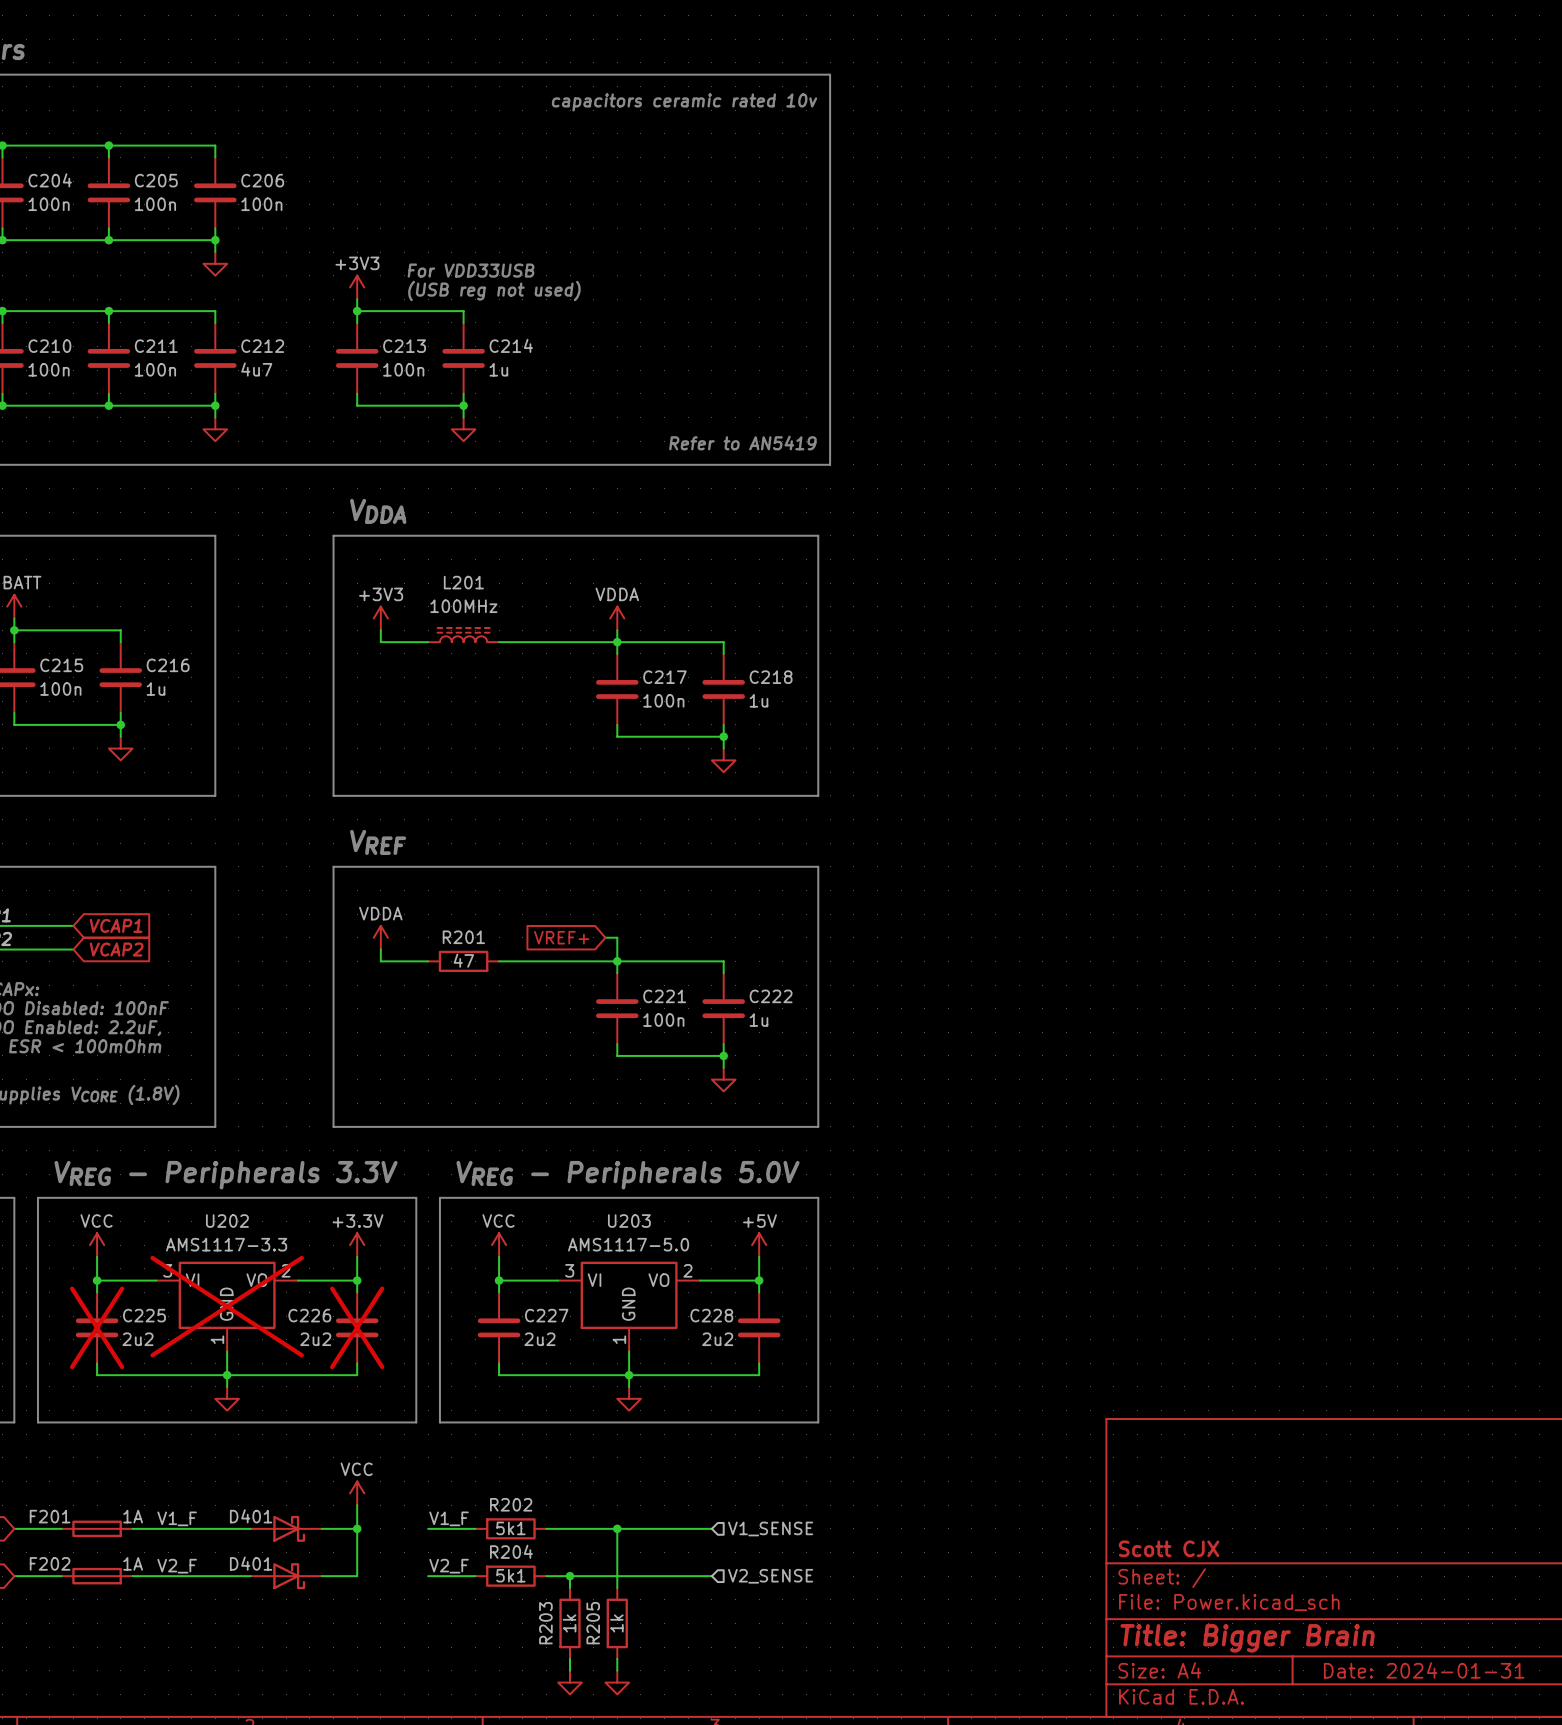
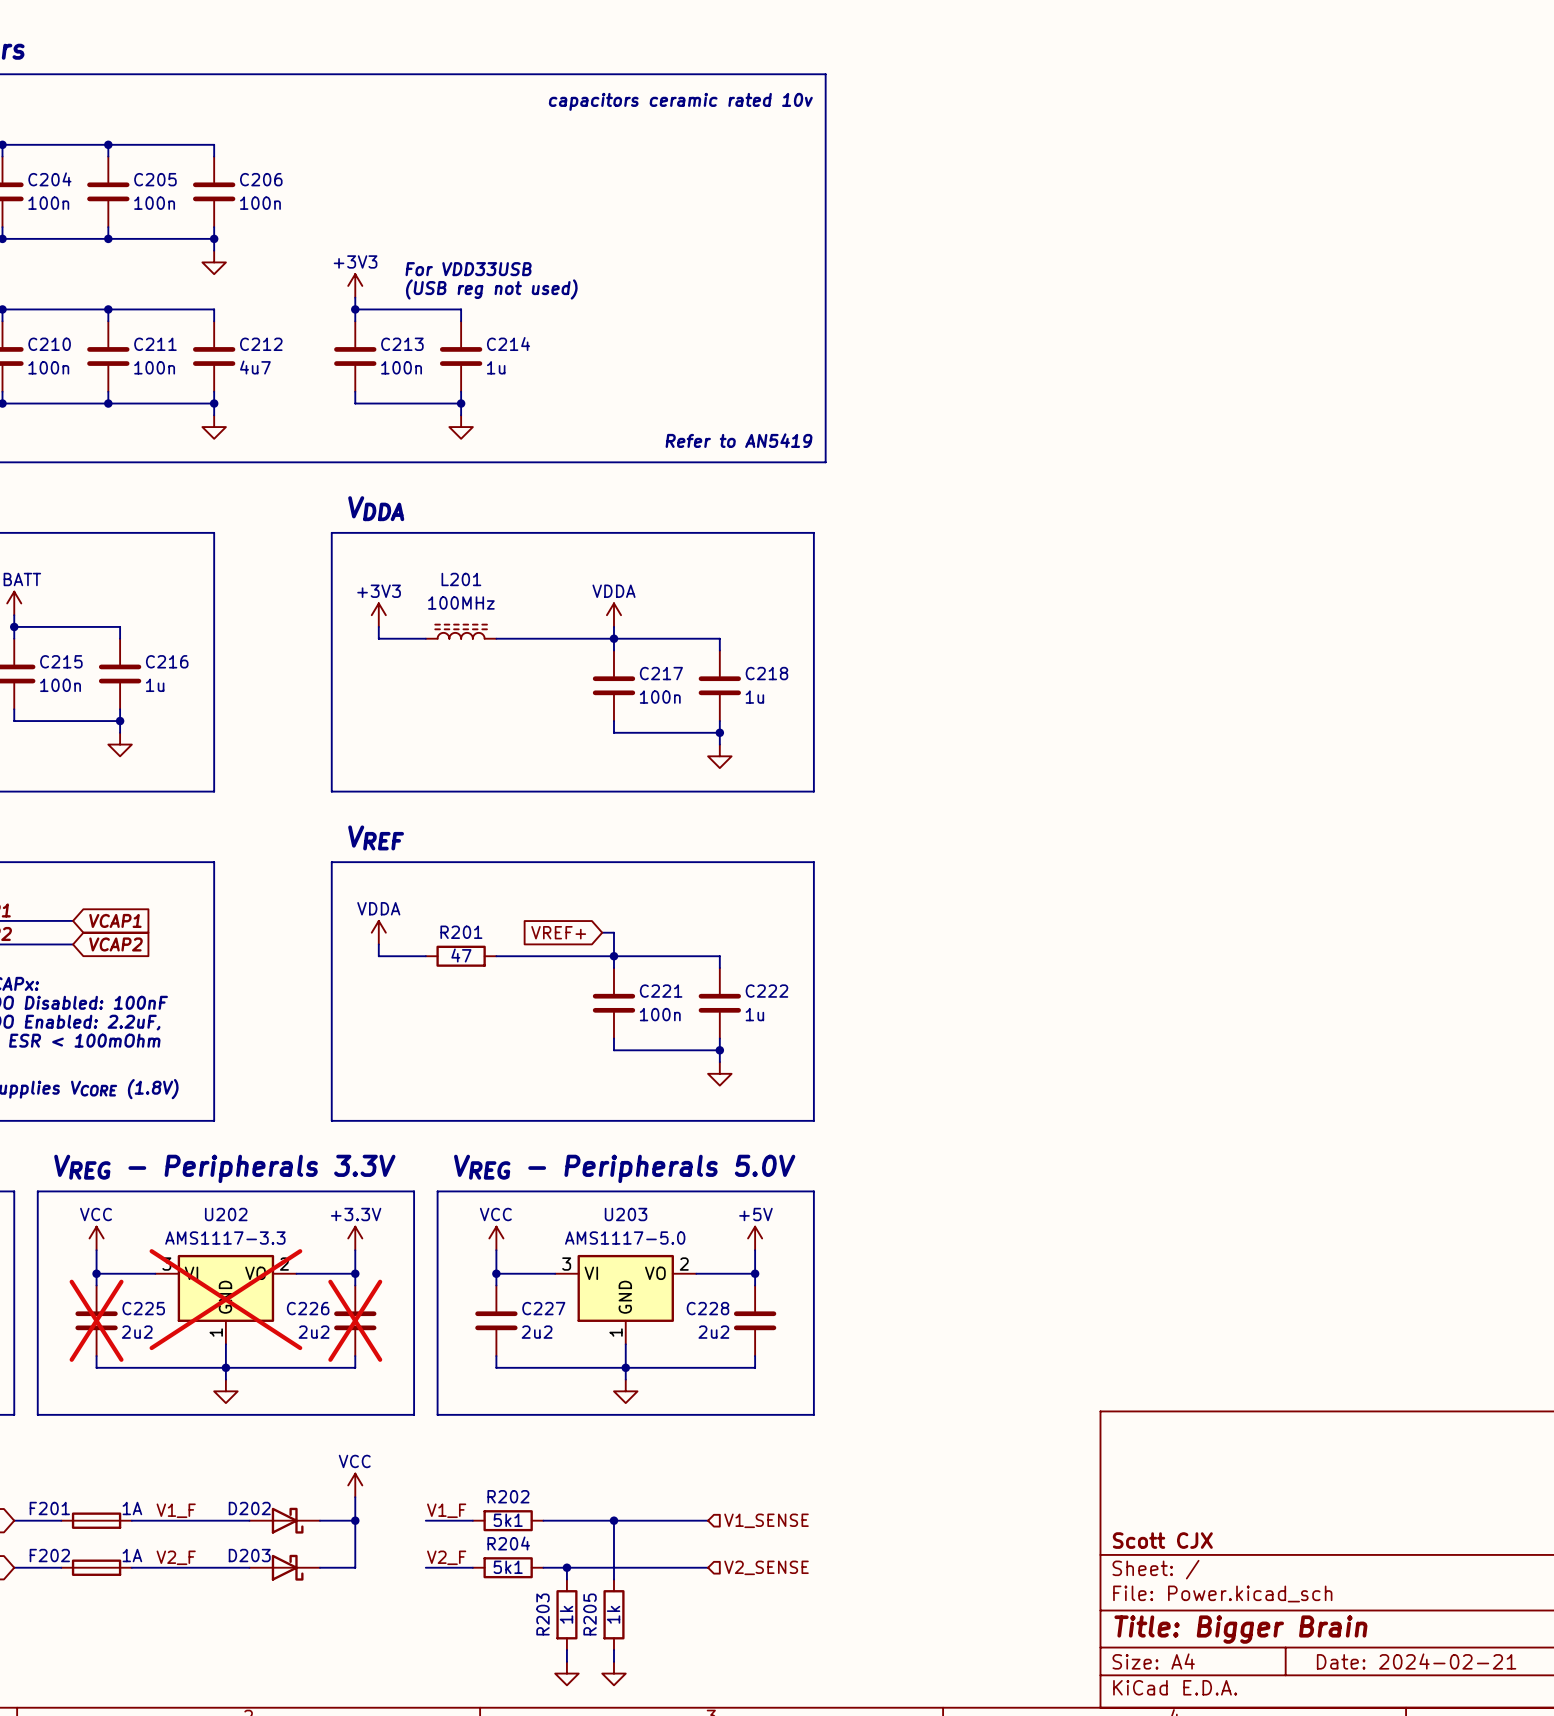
D401 name: D401 (251, 1516) -> D202 (249, 1508)
D401 name: D401 (251, 1563) -> D203 (249, 1555)
title block: Date: 2024-01-31 (1424, 1670) -> Date: 2024-02-21 (1416, 1661)

